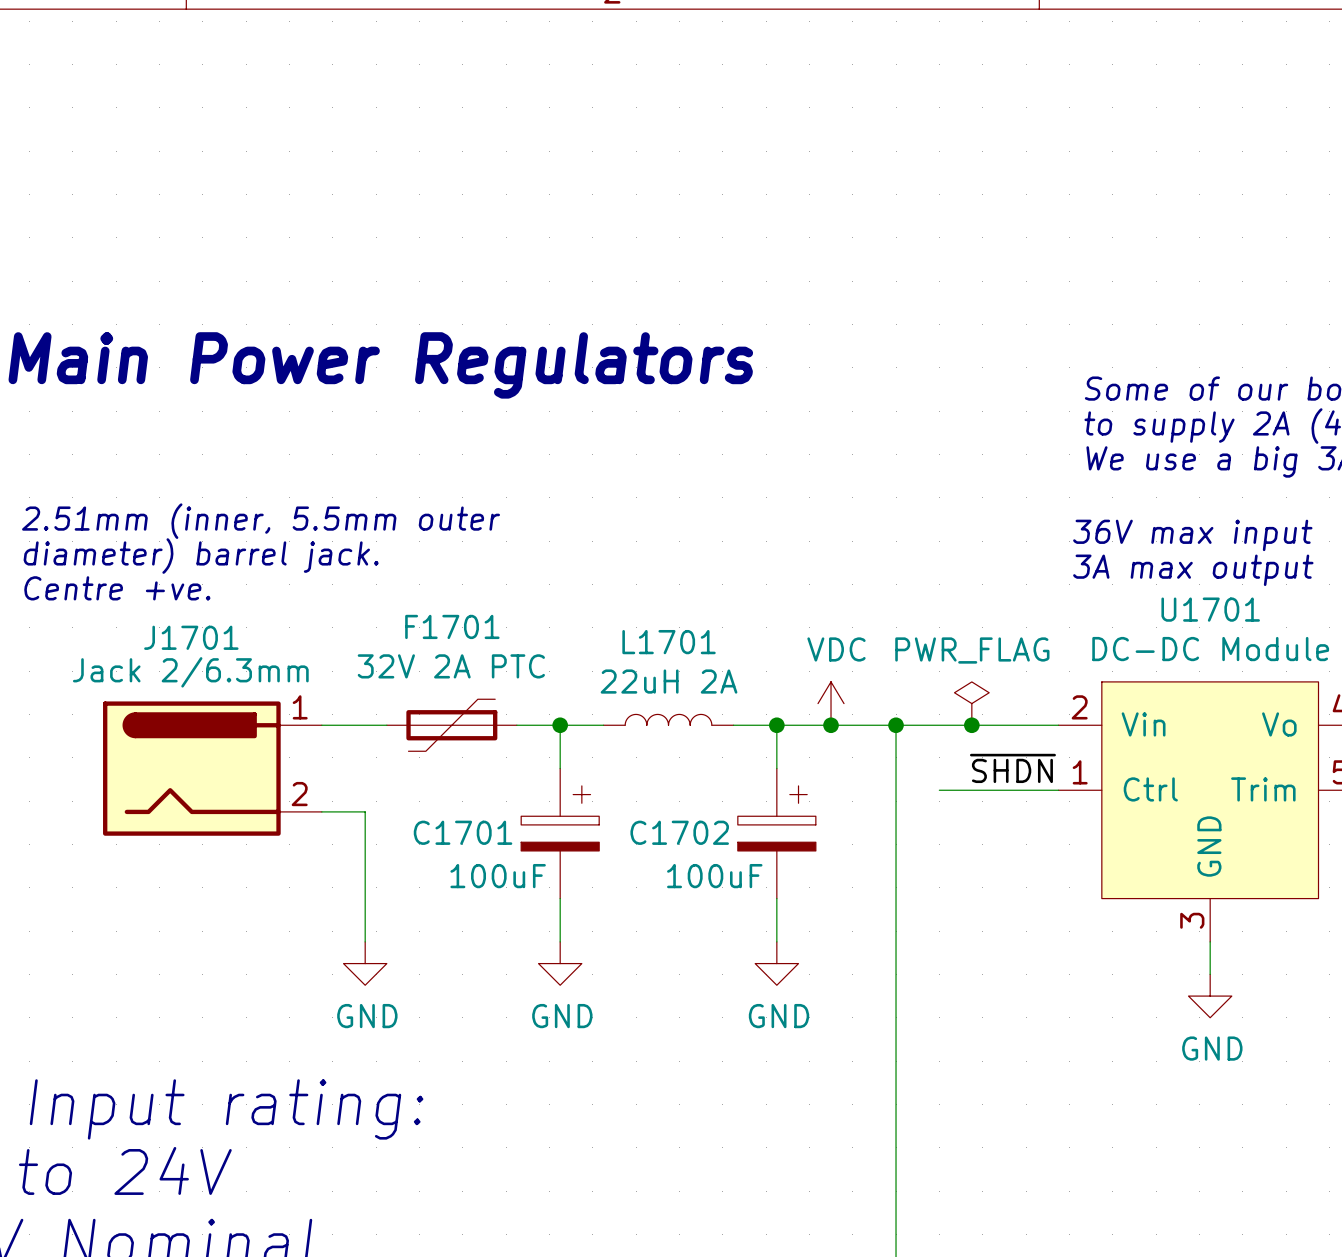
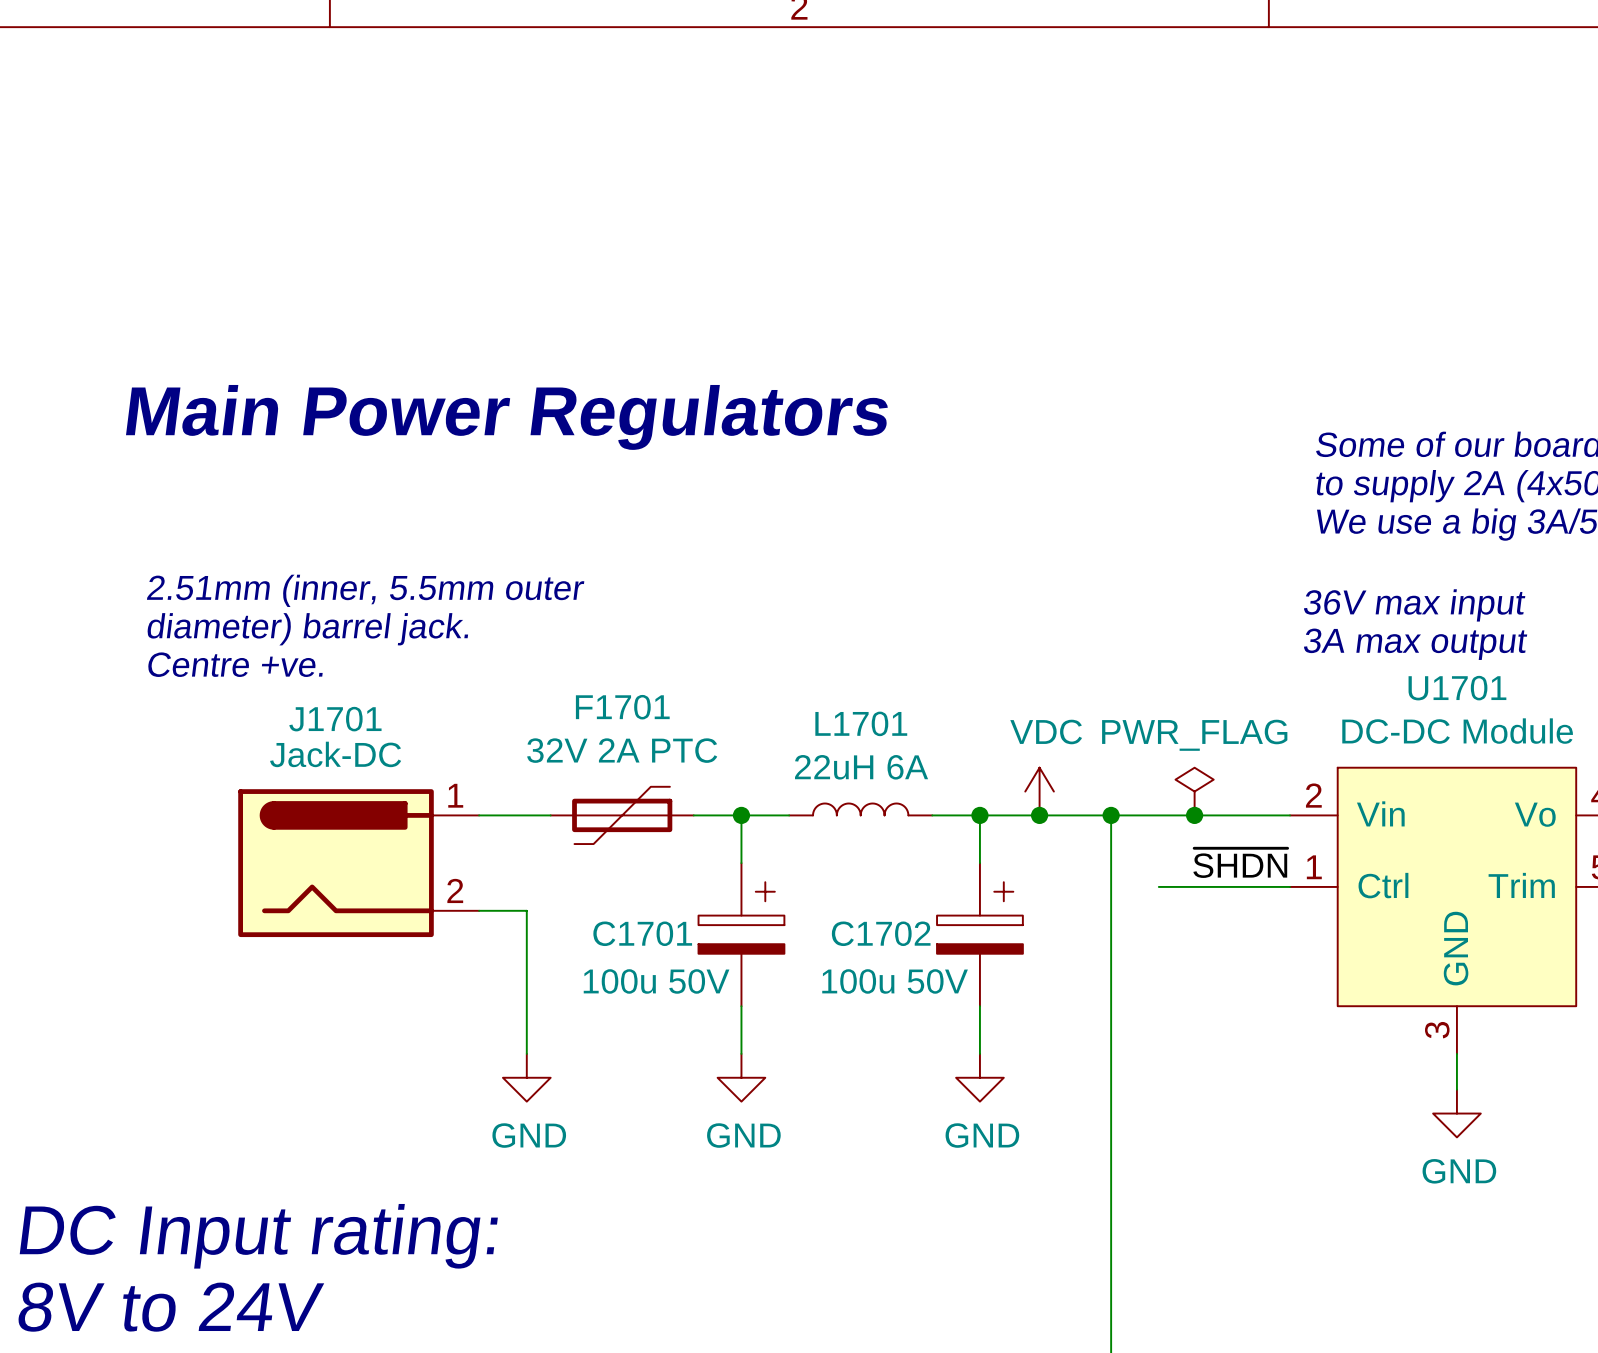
J1701 value: Jack 2/6.3mm (190, 672) -> Jack-DC (335, 754)
L1701 value: 22uH 2A (669, 681) -> 22uH 6A (861, 767)
C1701 value: 100uF (498, 876) -> 100u 50V (656, 981)
C1702 value: 100uF (714, 876) -> 100u 50V (895, 981)

